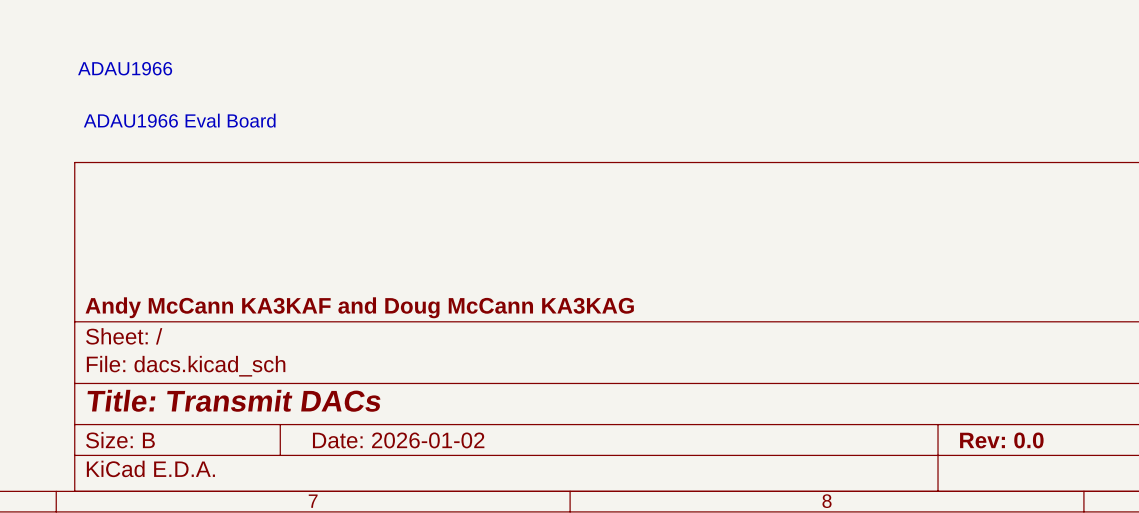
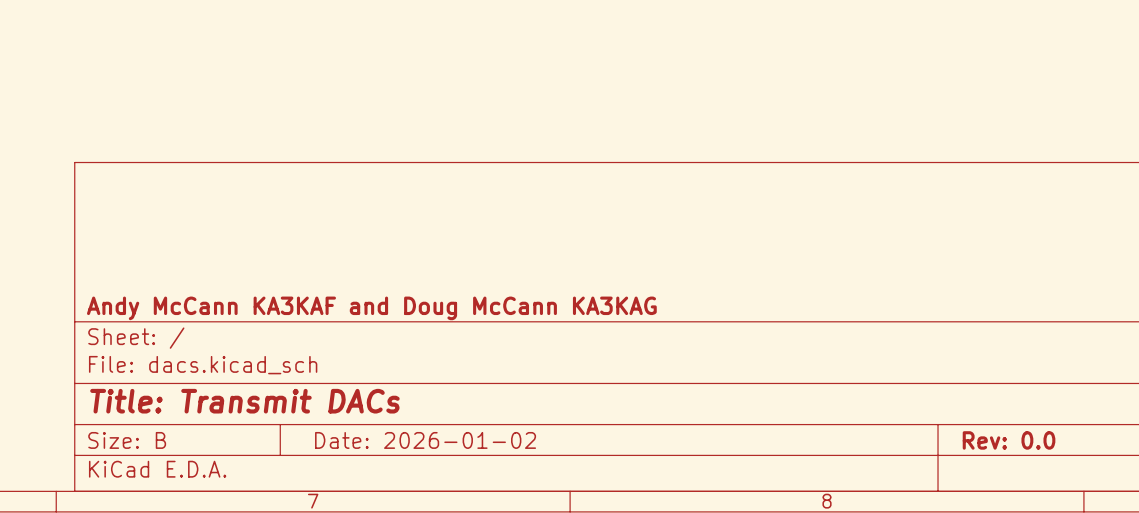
text: ADAU1966 (125, 68) -> none
text: ADAU1966 Eval Board (179, 120) -> none

